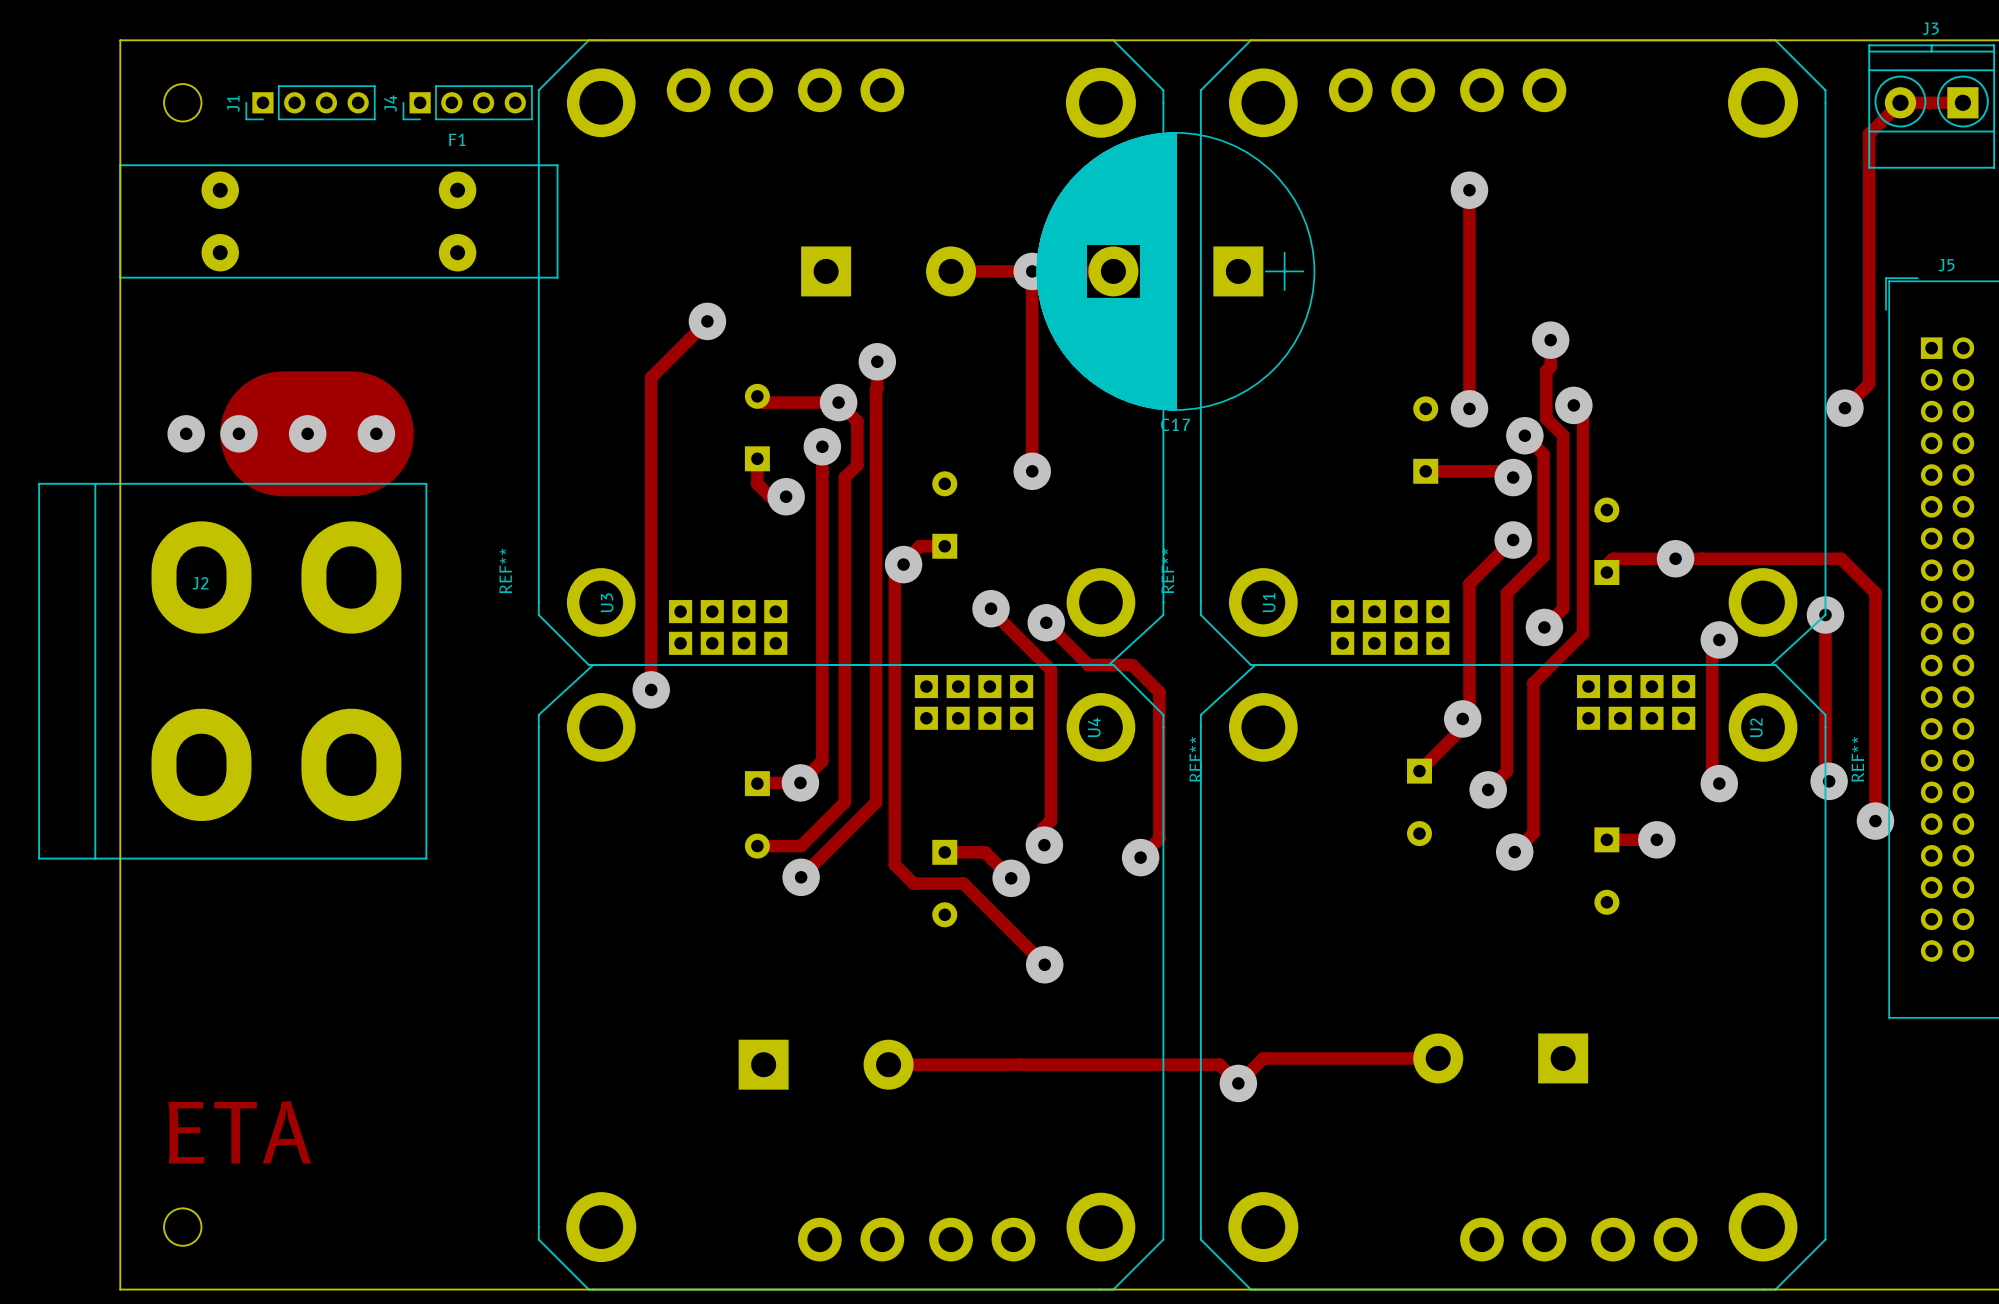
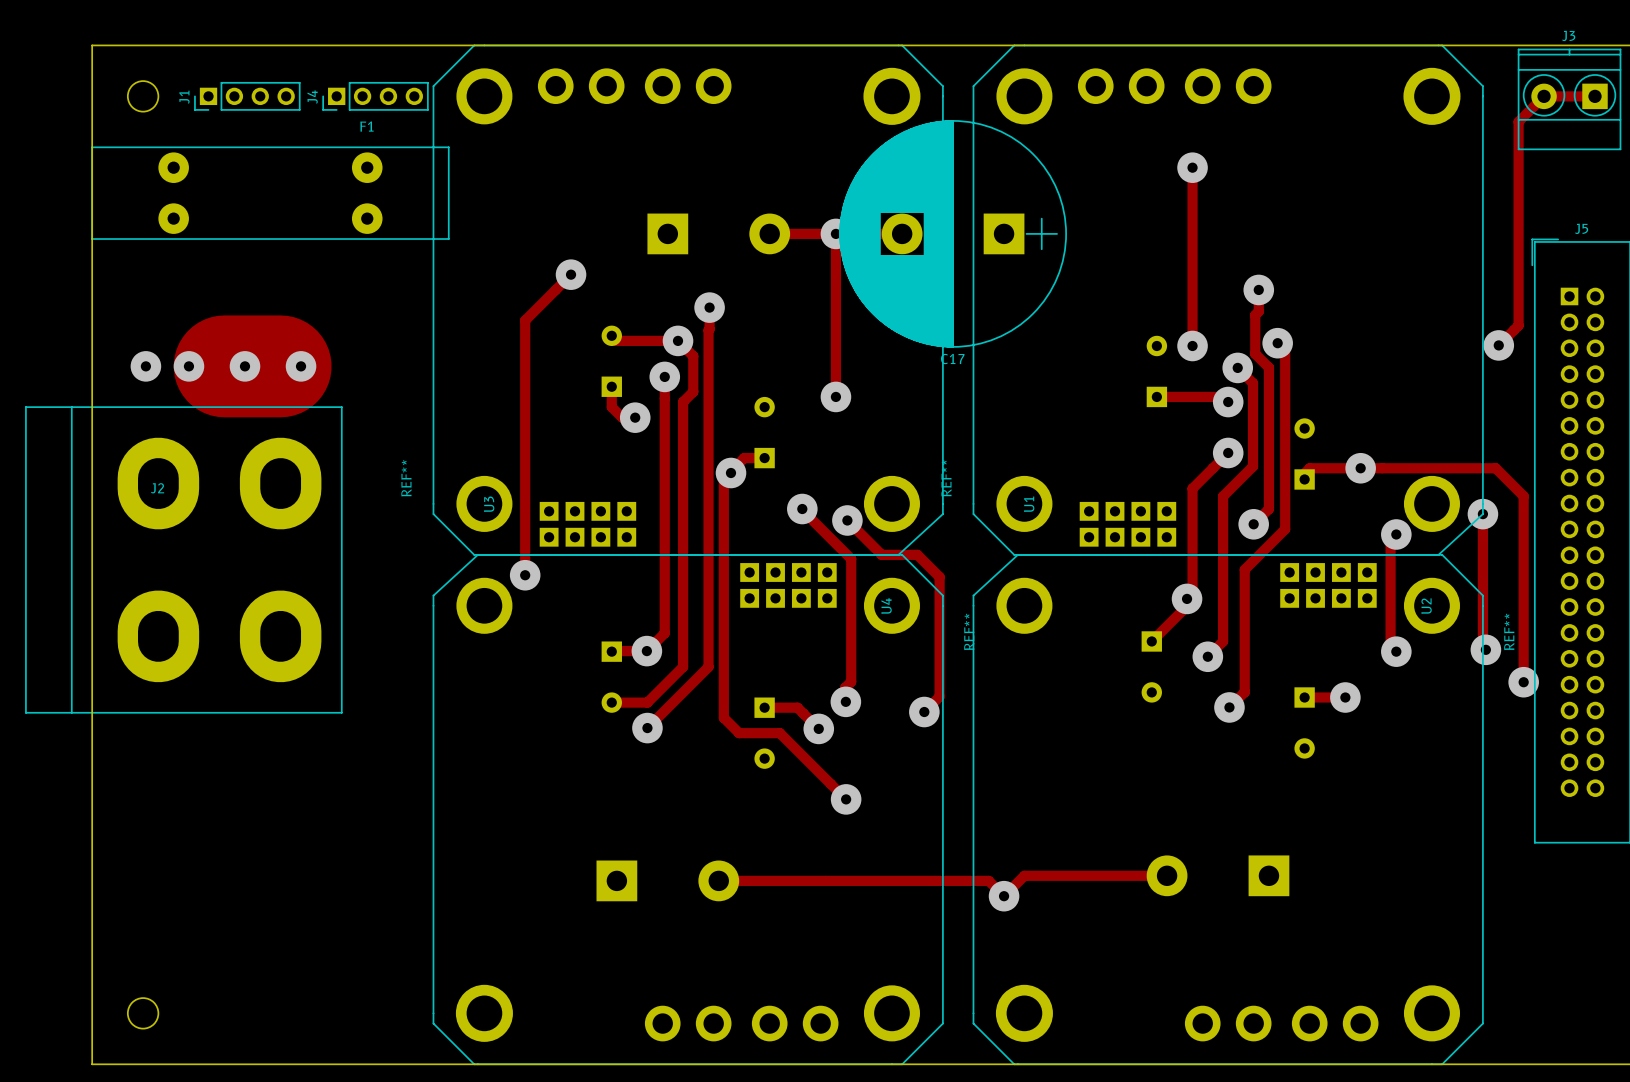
text: ETA (239, 1132) -> none

